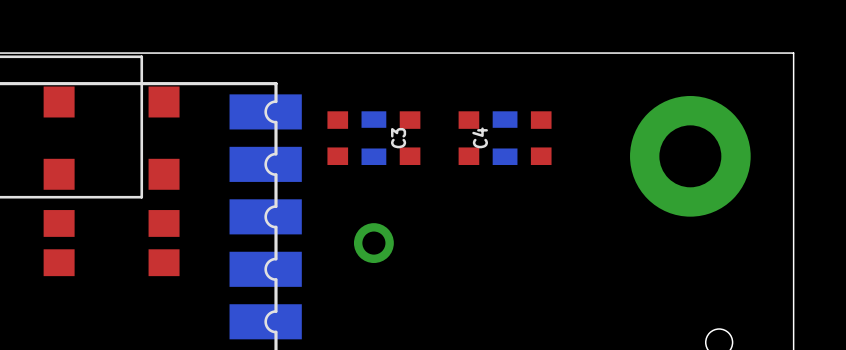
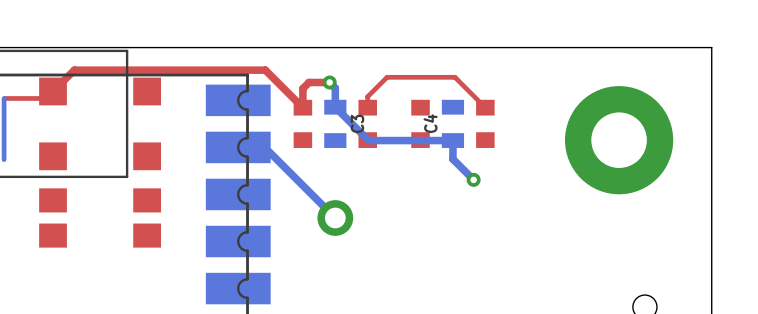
bottom track: none -> (329, 82) (335, 88) (335, 107) (368, 140) (452, 140) (452, 159) (473, 179)
top track: none -> (329, 82) (308, 82) (302, 88) (302, 107) (265, 70) (74, 70) (46, 98) (4, 98)
via: none -> (329, 82)
bottom track: none -> (4, 98) (4, 159)
top track: none -> (485, 107) (454, 77) (387, 77) (367, 96) (367, 107)
bottom track: none -> (238, 147) (264, 147) (335, 217)
via: none -> (473, 179)

